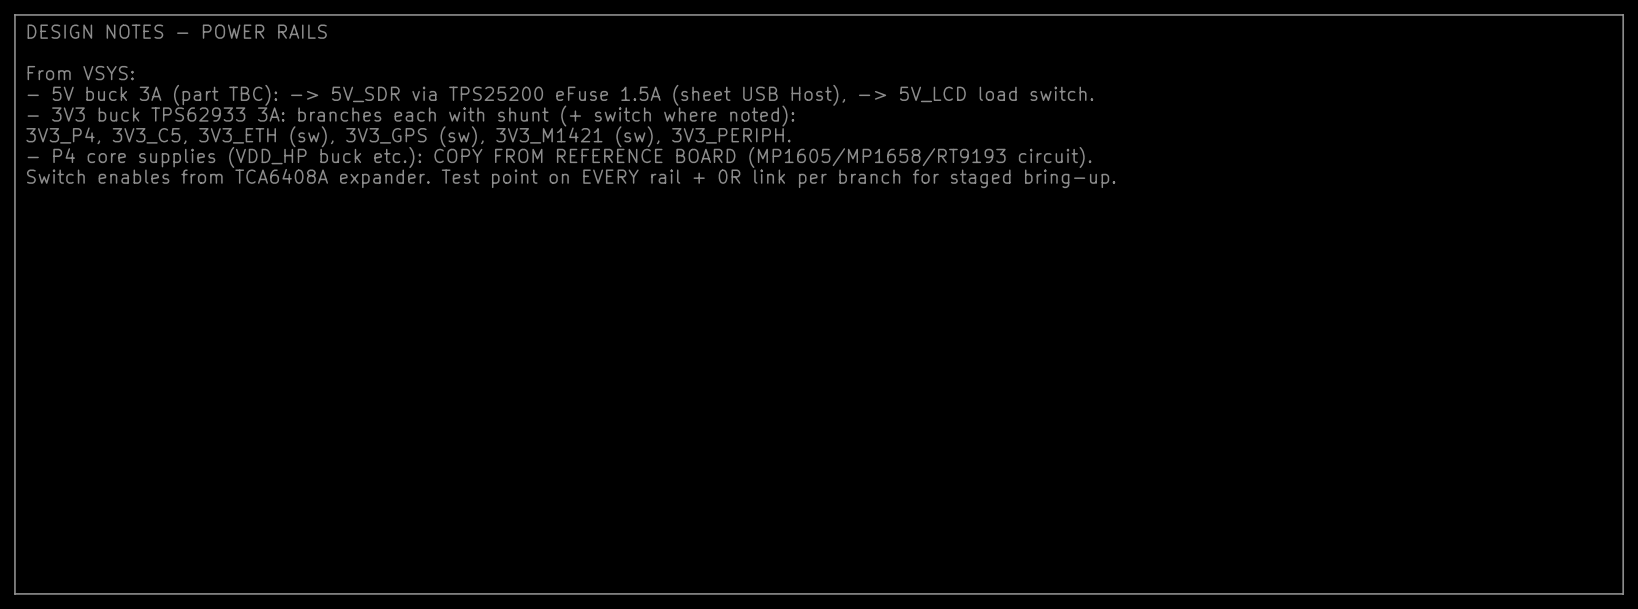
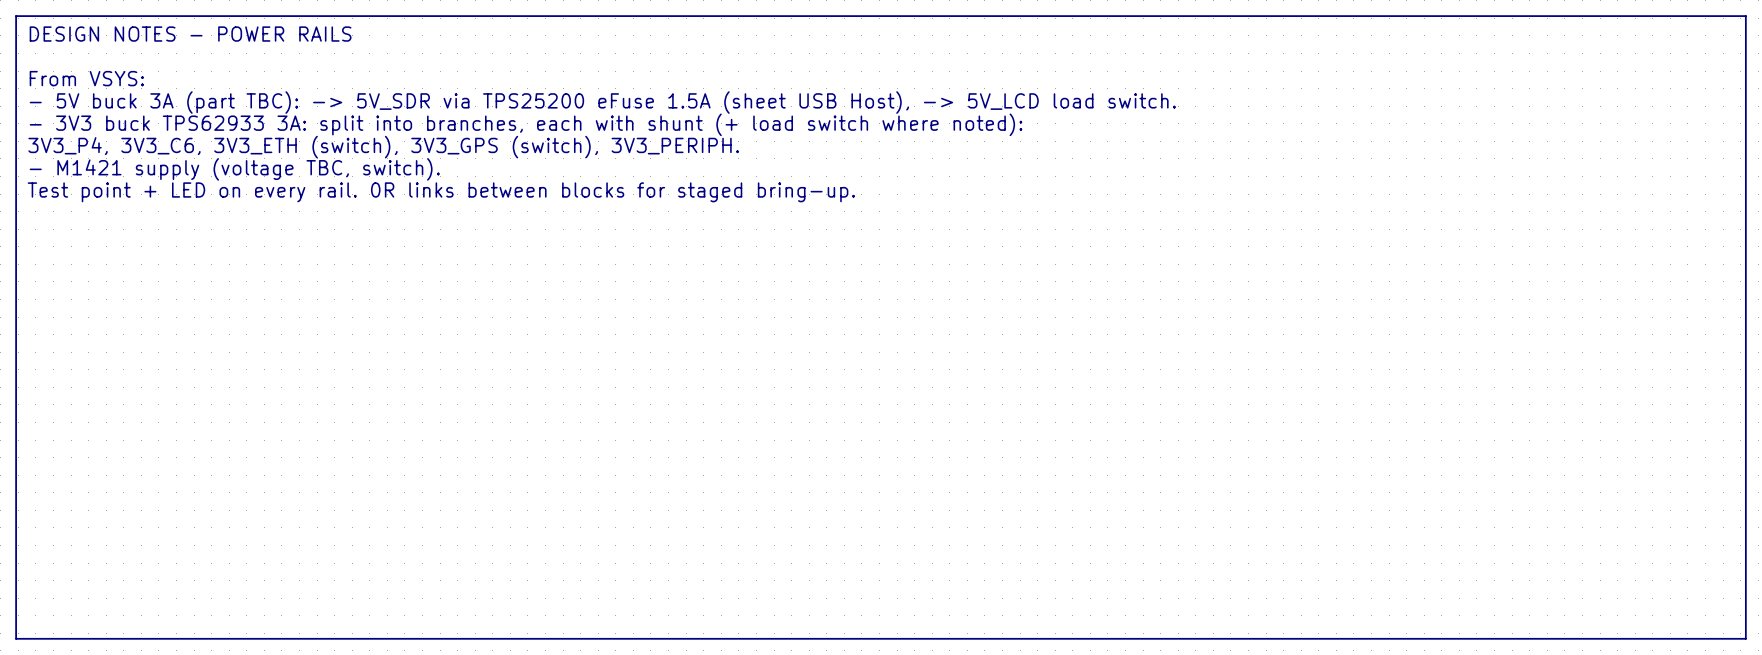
text: - 3V3 buck TPS62933 3A: branches each with shunt (+ switch where noted): (410, 116) -> - 3V3 buck TPS62933 3A: split into branches, each with shunt (+ load switch where noted): (525, 124)
text: 3V3_P4, 3V3_C5, 3V3_ETH (sw), 3V3_GPS (sw), 3V3_M1421 (sw), 3V3_PERIPH. (408, 136) -> 3V3_P4, 3V3_C6, 3V3_ETH (switch), 3V3_GPS (switch), 3V3_PERIPH. (383, 147)
text: - P4 core supplies (VDD_HP buck etc.): COPY FROM REFERENCE BOARD (MP1605/MP1658/RT9193 circuit). (559, 157) -> - M1421 supply (voltage TBC, switch). (234, 169)
text: Switch enables from TCA6408A expander. Test point on EVERY rail + 0R link per branch for staged bring-up. (571, 178) -> Test point + LED on every rail. 0R links between blocks for staged bring-up. (441, 192)

